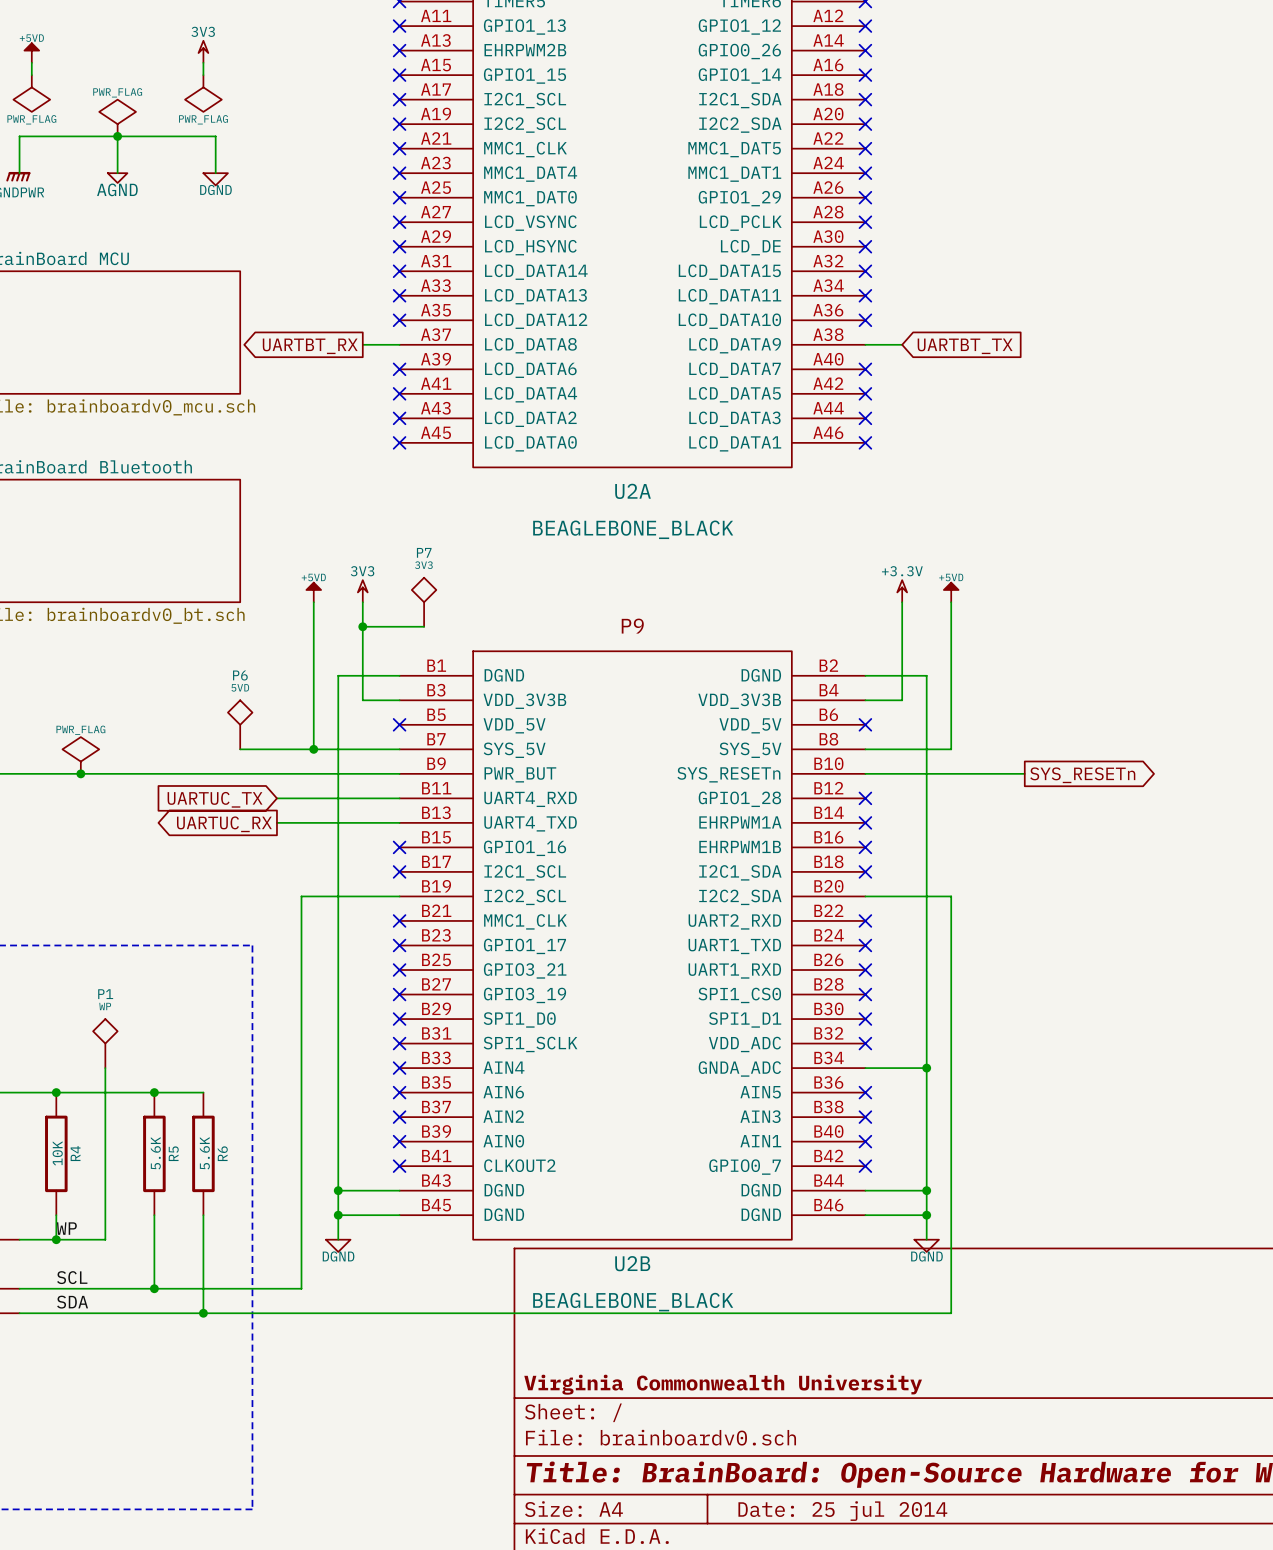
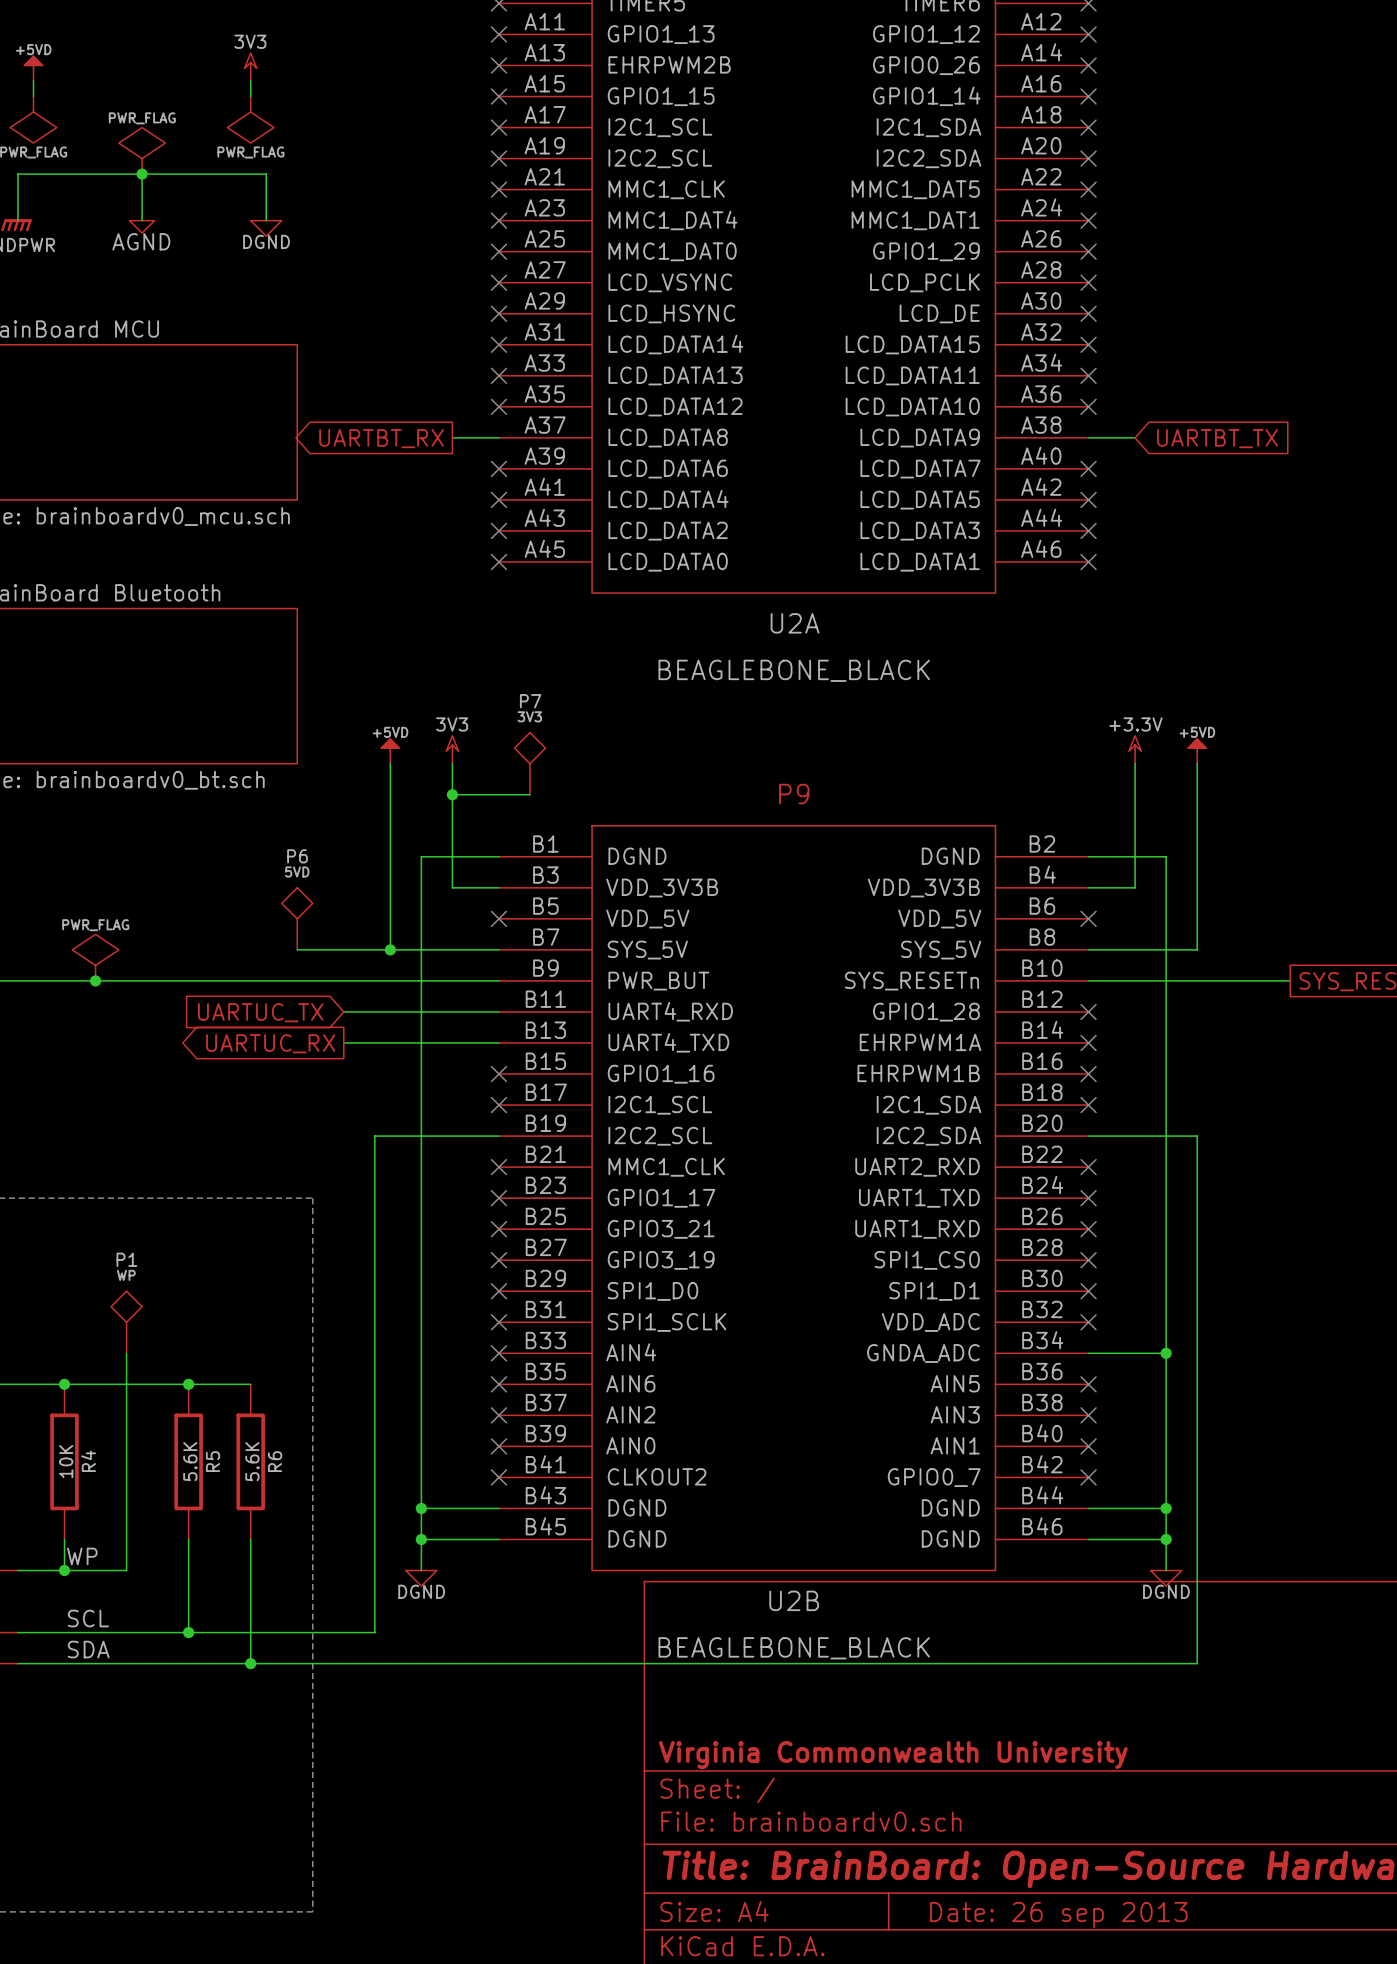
title block: Date: 25 jul 2014 (842, 1511) -> Date: 26 sep 2013 (1058, 1915)

